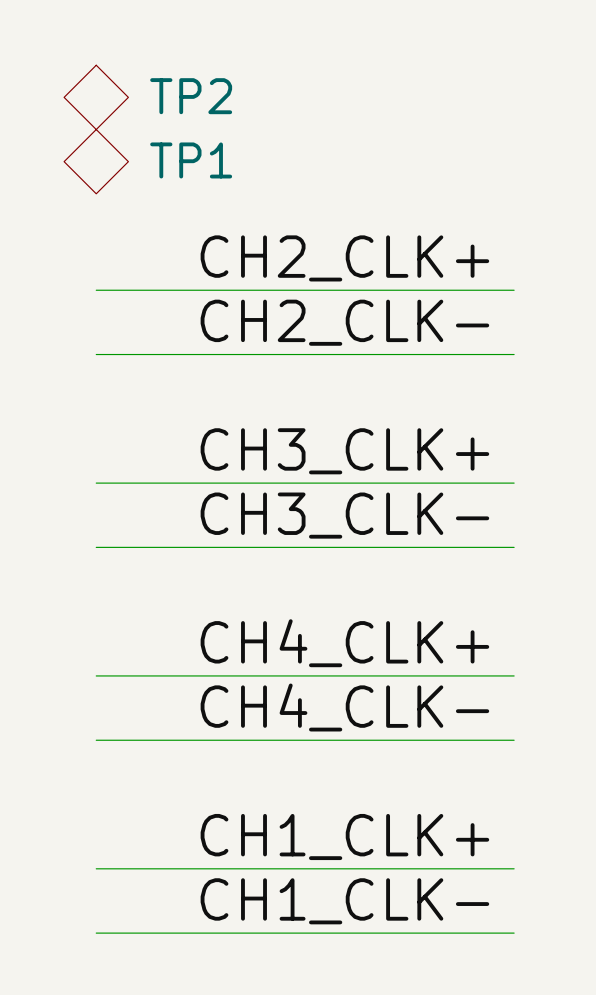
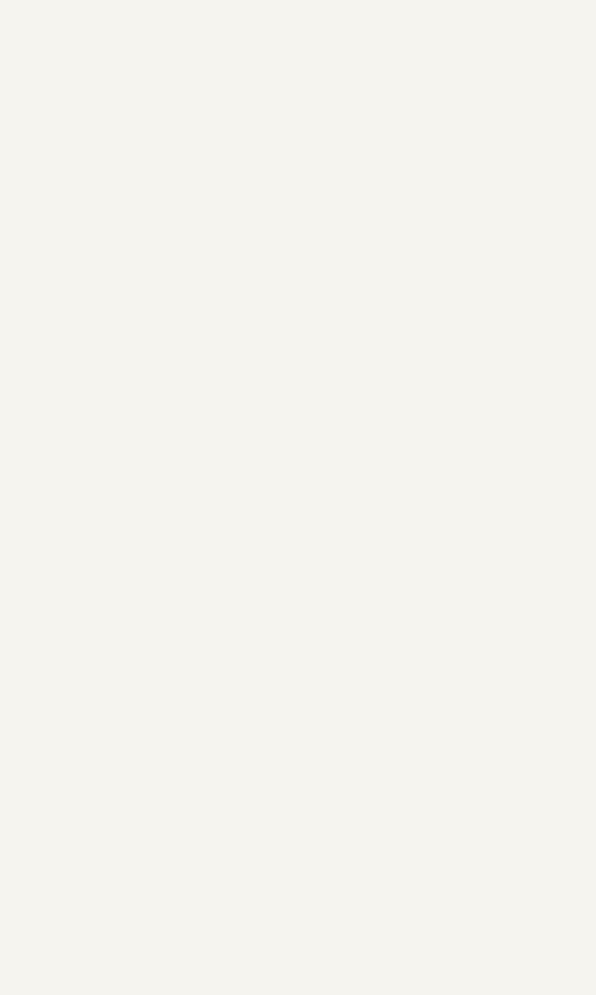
TP2: (96, 97) -> none
TP1: (96, 161) -> none
label: CH2_CLK+ (344, 258) -> none
wire: (96, 290) (514, 290) -> none
label: CH2_CLK- (344, 322) -> none
wire: (96, 354) (514, 354) -> none
label: CH3_CLK+ (344, 451) -> none
wire: (96, 483) (514, 483) -> none
label: CH3_CLK- (344, 515) -> none
wire: (96, 547) (514, 547) -> none
label: CH4_CLK+ (344, 643) -> none
wire: (96, 675) (514, 675) -> none
label: CH4_CLK- (344, 707) -> none
wire: (96, 740) (514, 740) -> none
label: CH1_CLK+ (344, 837) -> none
wire: (96, 868) (514, 868) -> none
label: CH1_CLK- (344, 901) -> none
wire: (96, 933) (514, 933) -> none

